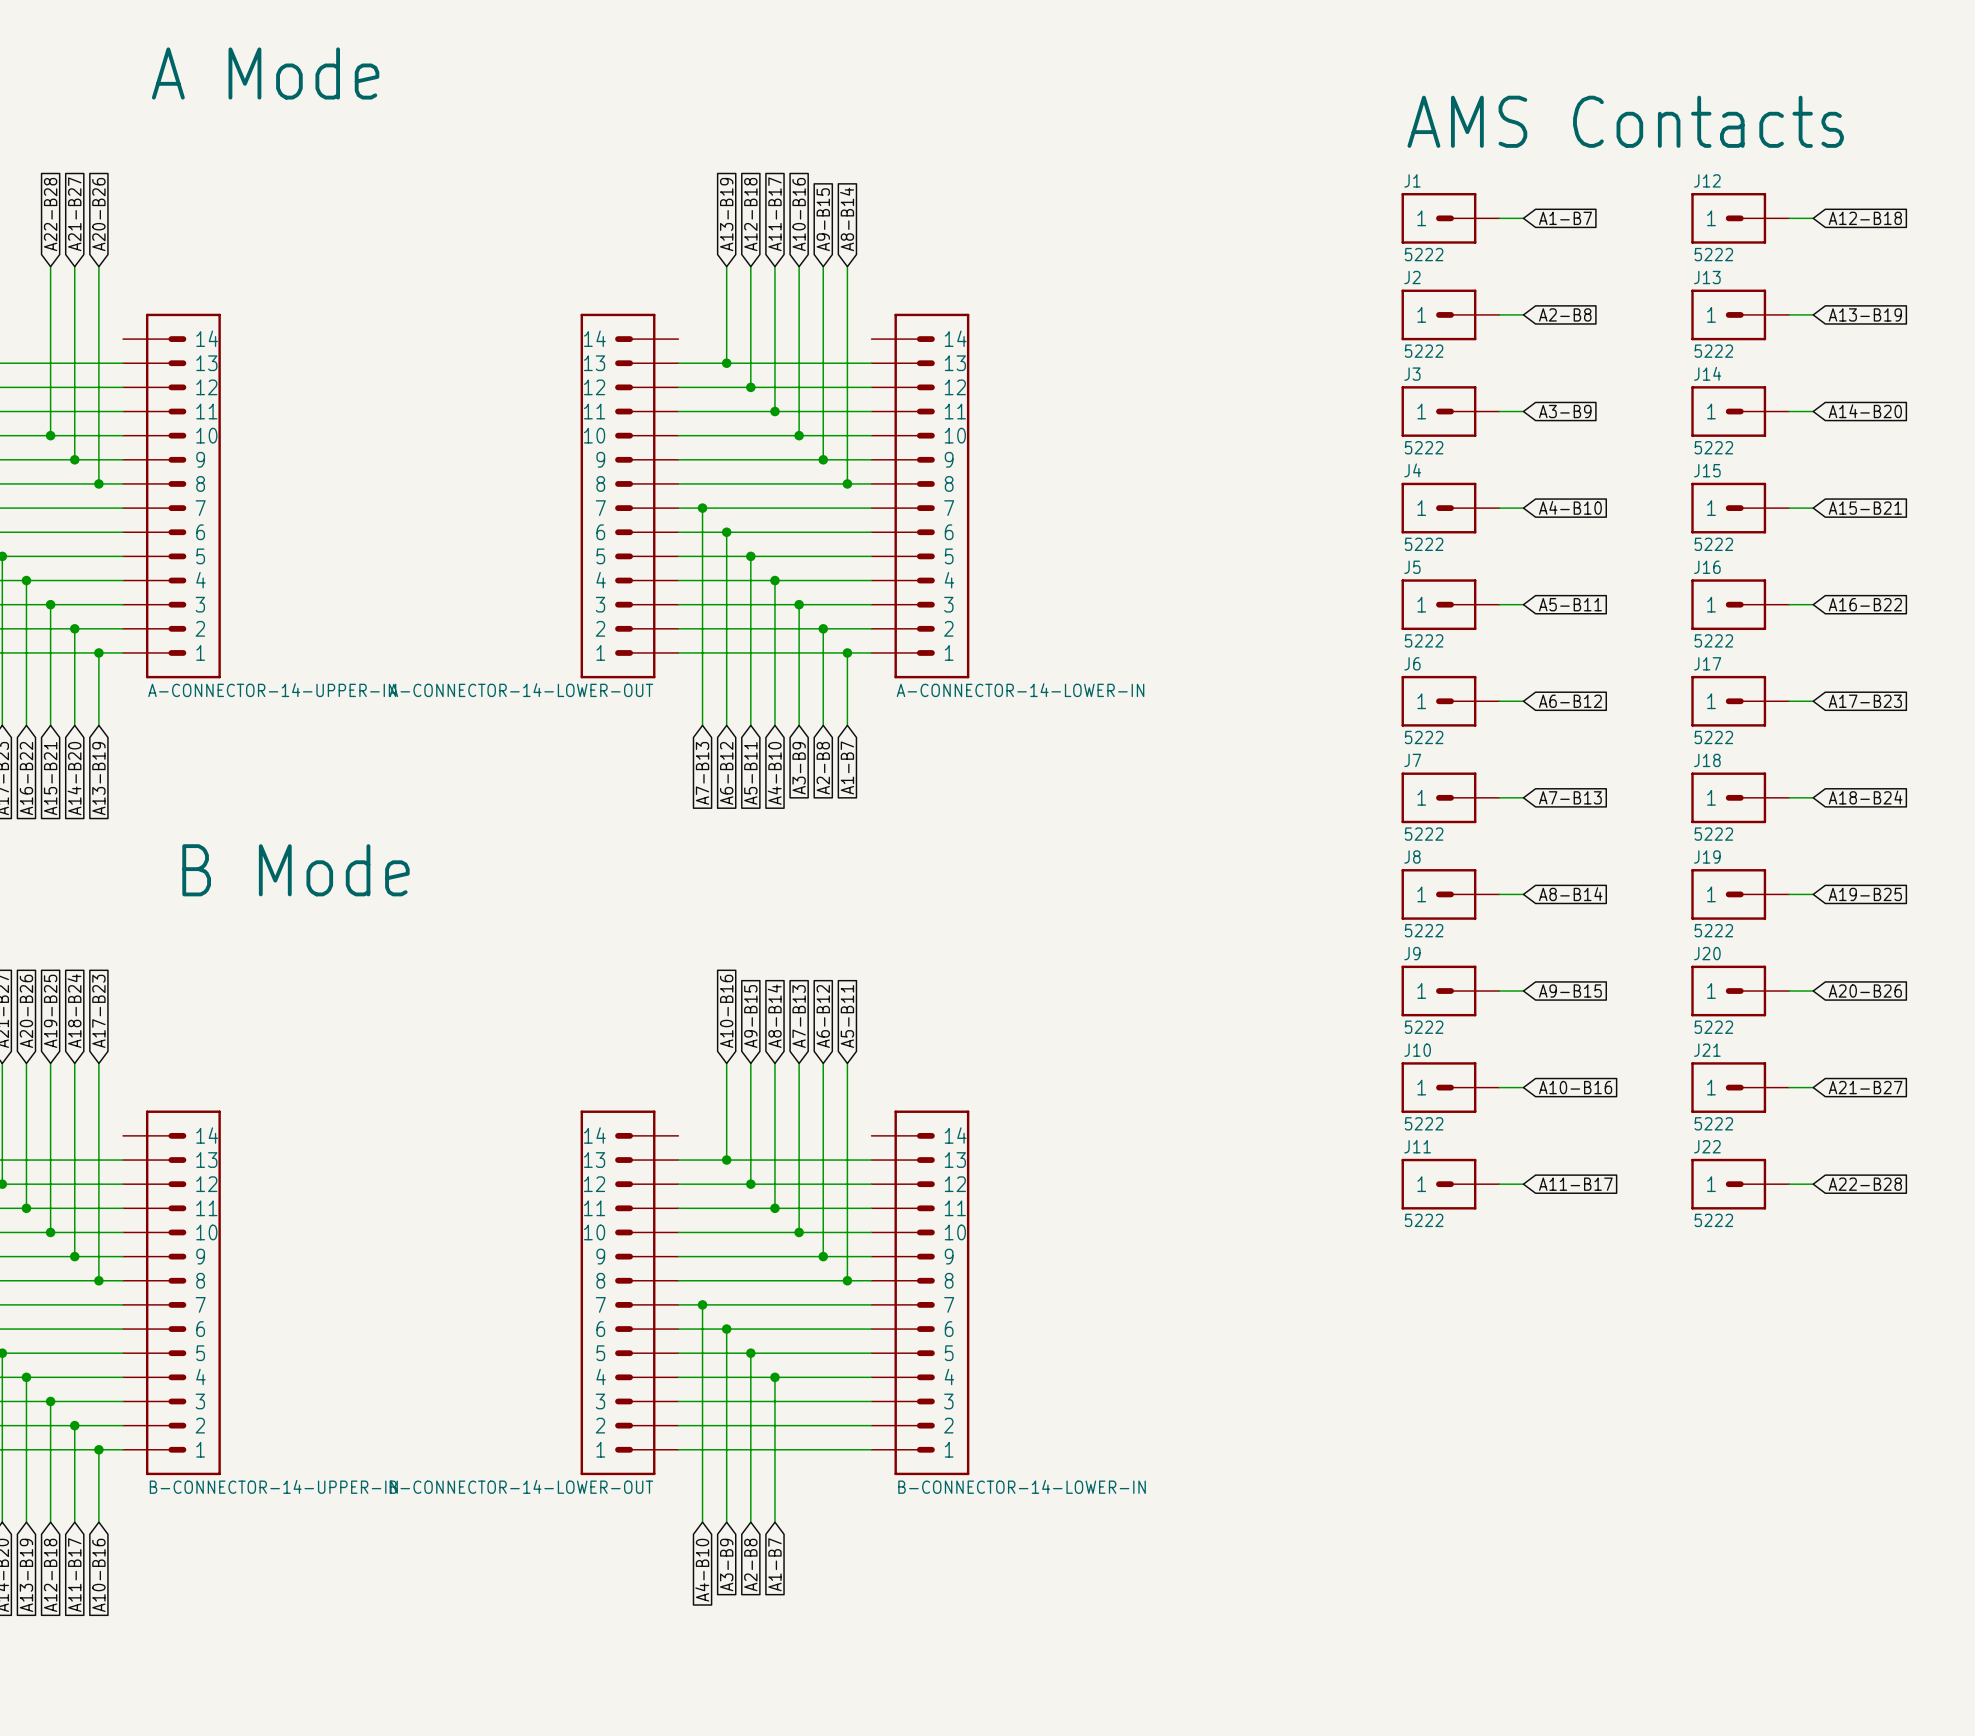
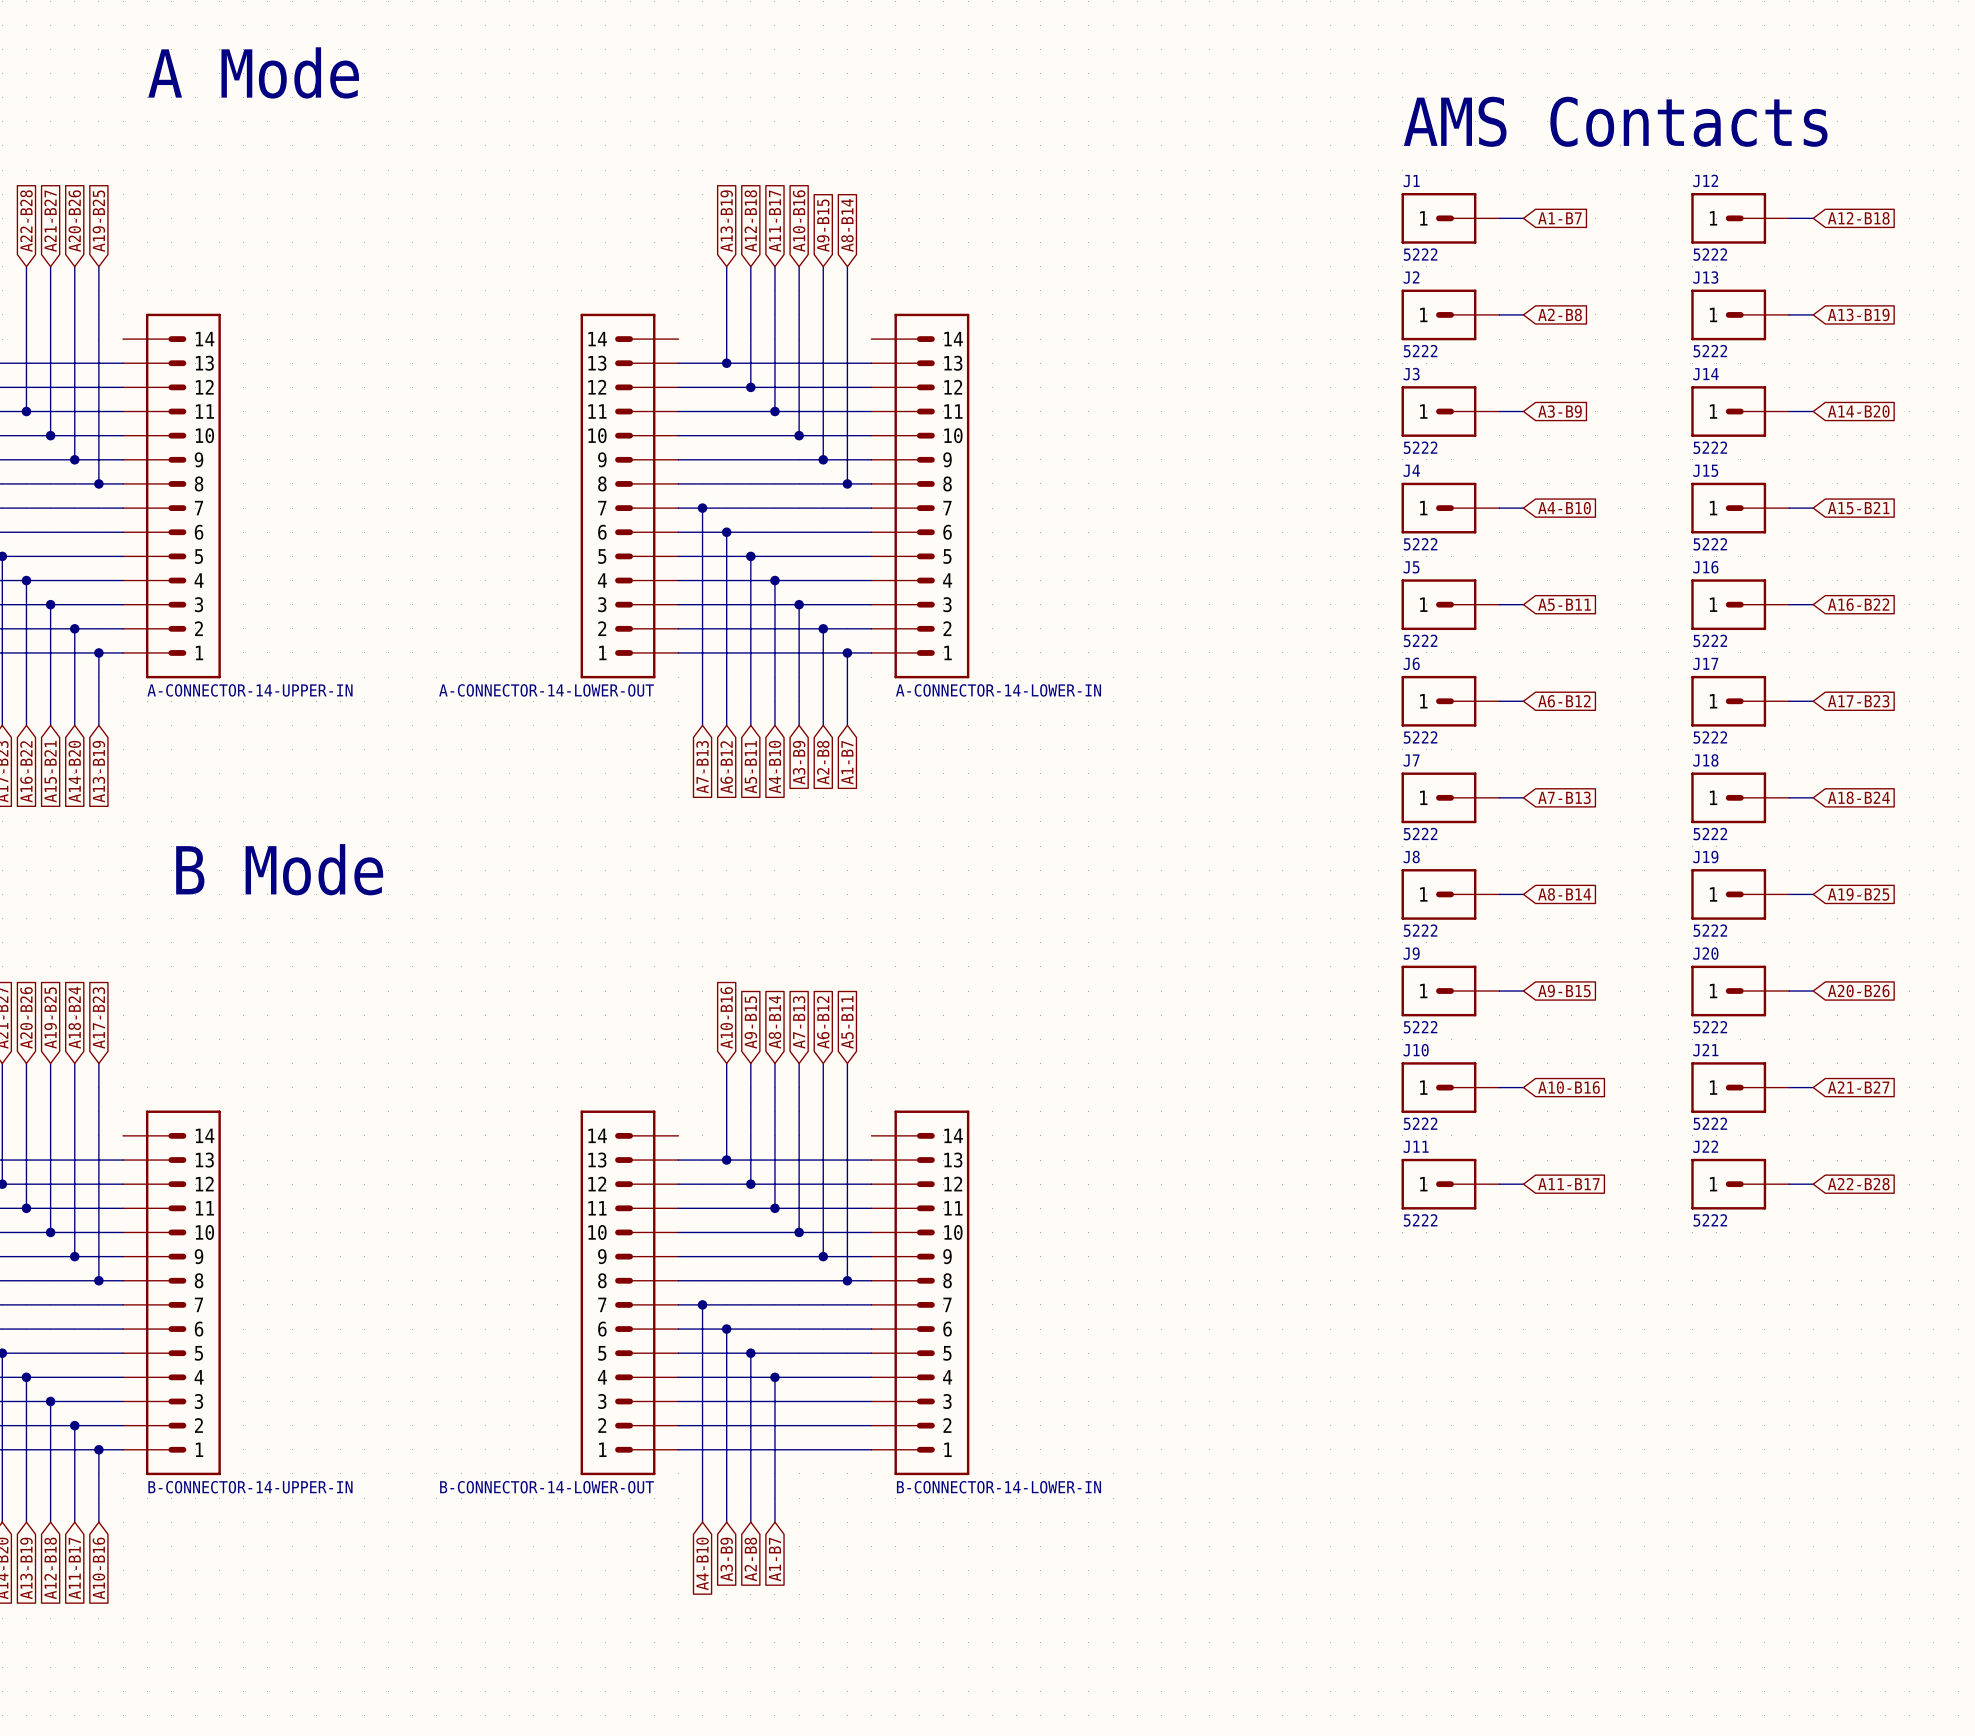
global label: none -> A22-B28 (26, 221)
global label: A22-B28 (50, 214) -> A21-B27 (50, 221)
global label: A21-B27 (74, 214) -> A20-B26 (74, 221)
global label: A20-B26 (98, 214) -> A19-B25 (98, 221)
wire: none -> (26, 266) (26, 411)
junction: none -> (26, 411)

